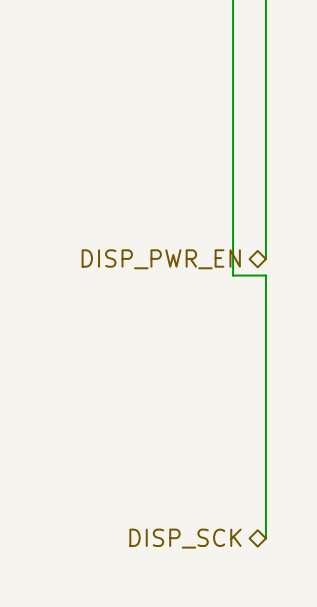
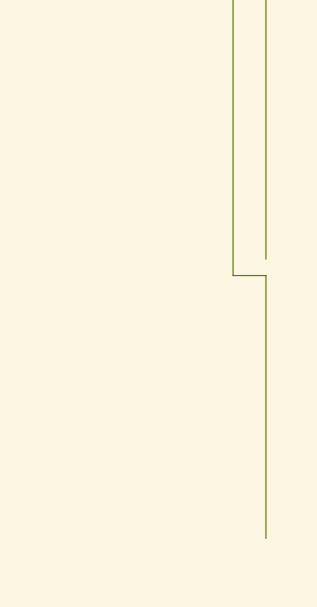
hierarchical label: DISP_PWR_EN (161, 259) -> none
hierarchical label: DISP_SCK (185, 538) -> none

